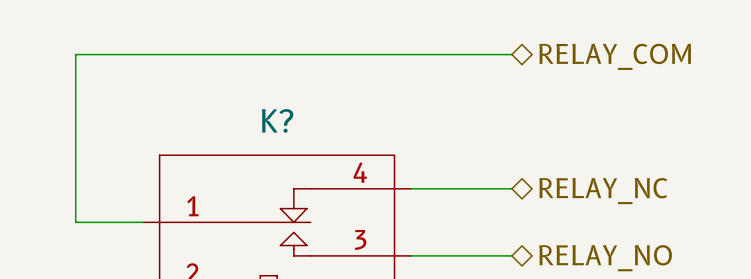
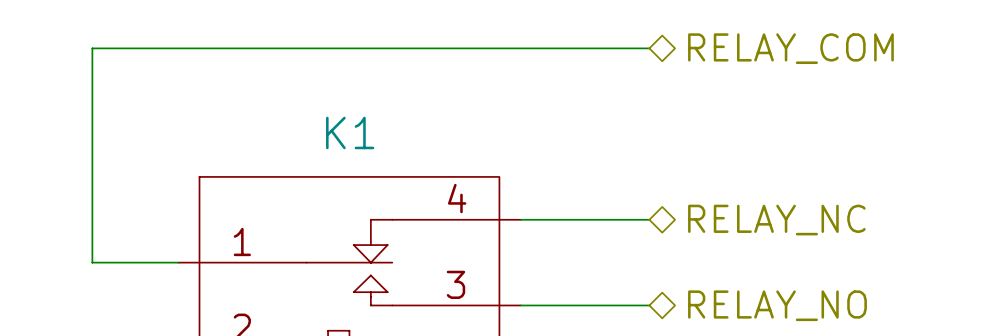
K? name: K? (277, 120) -> K1 (350, 132)

